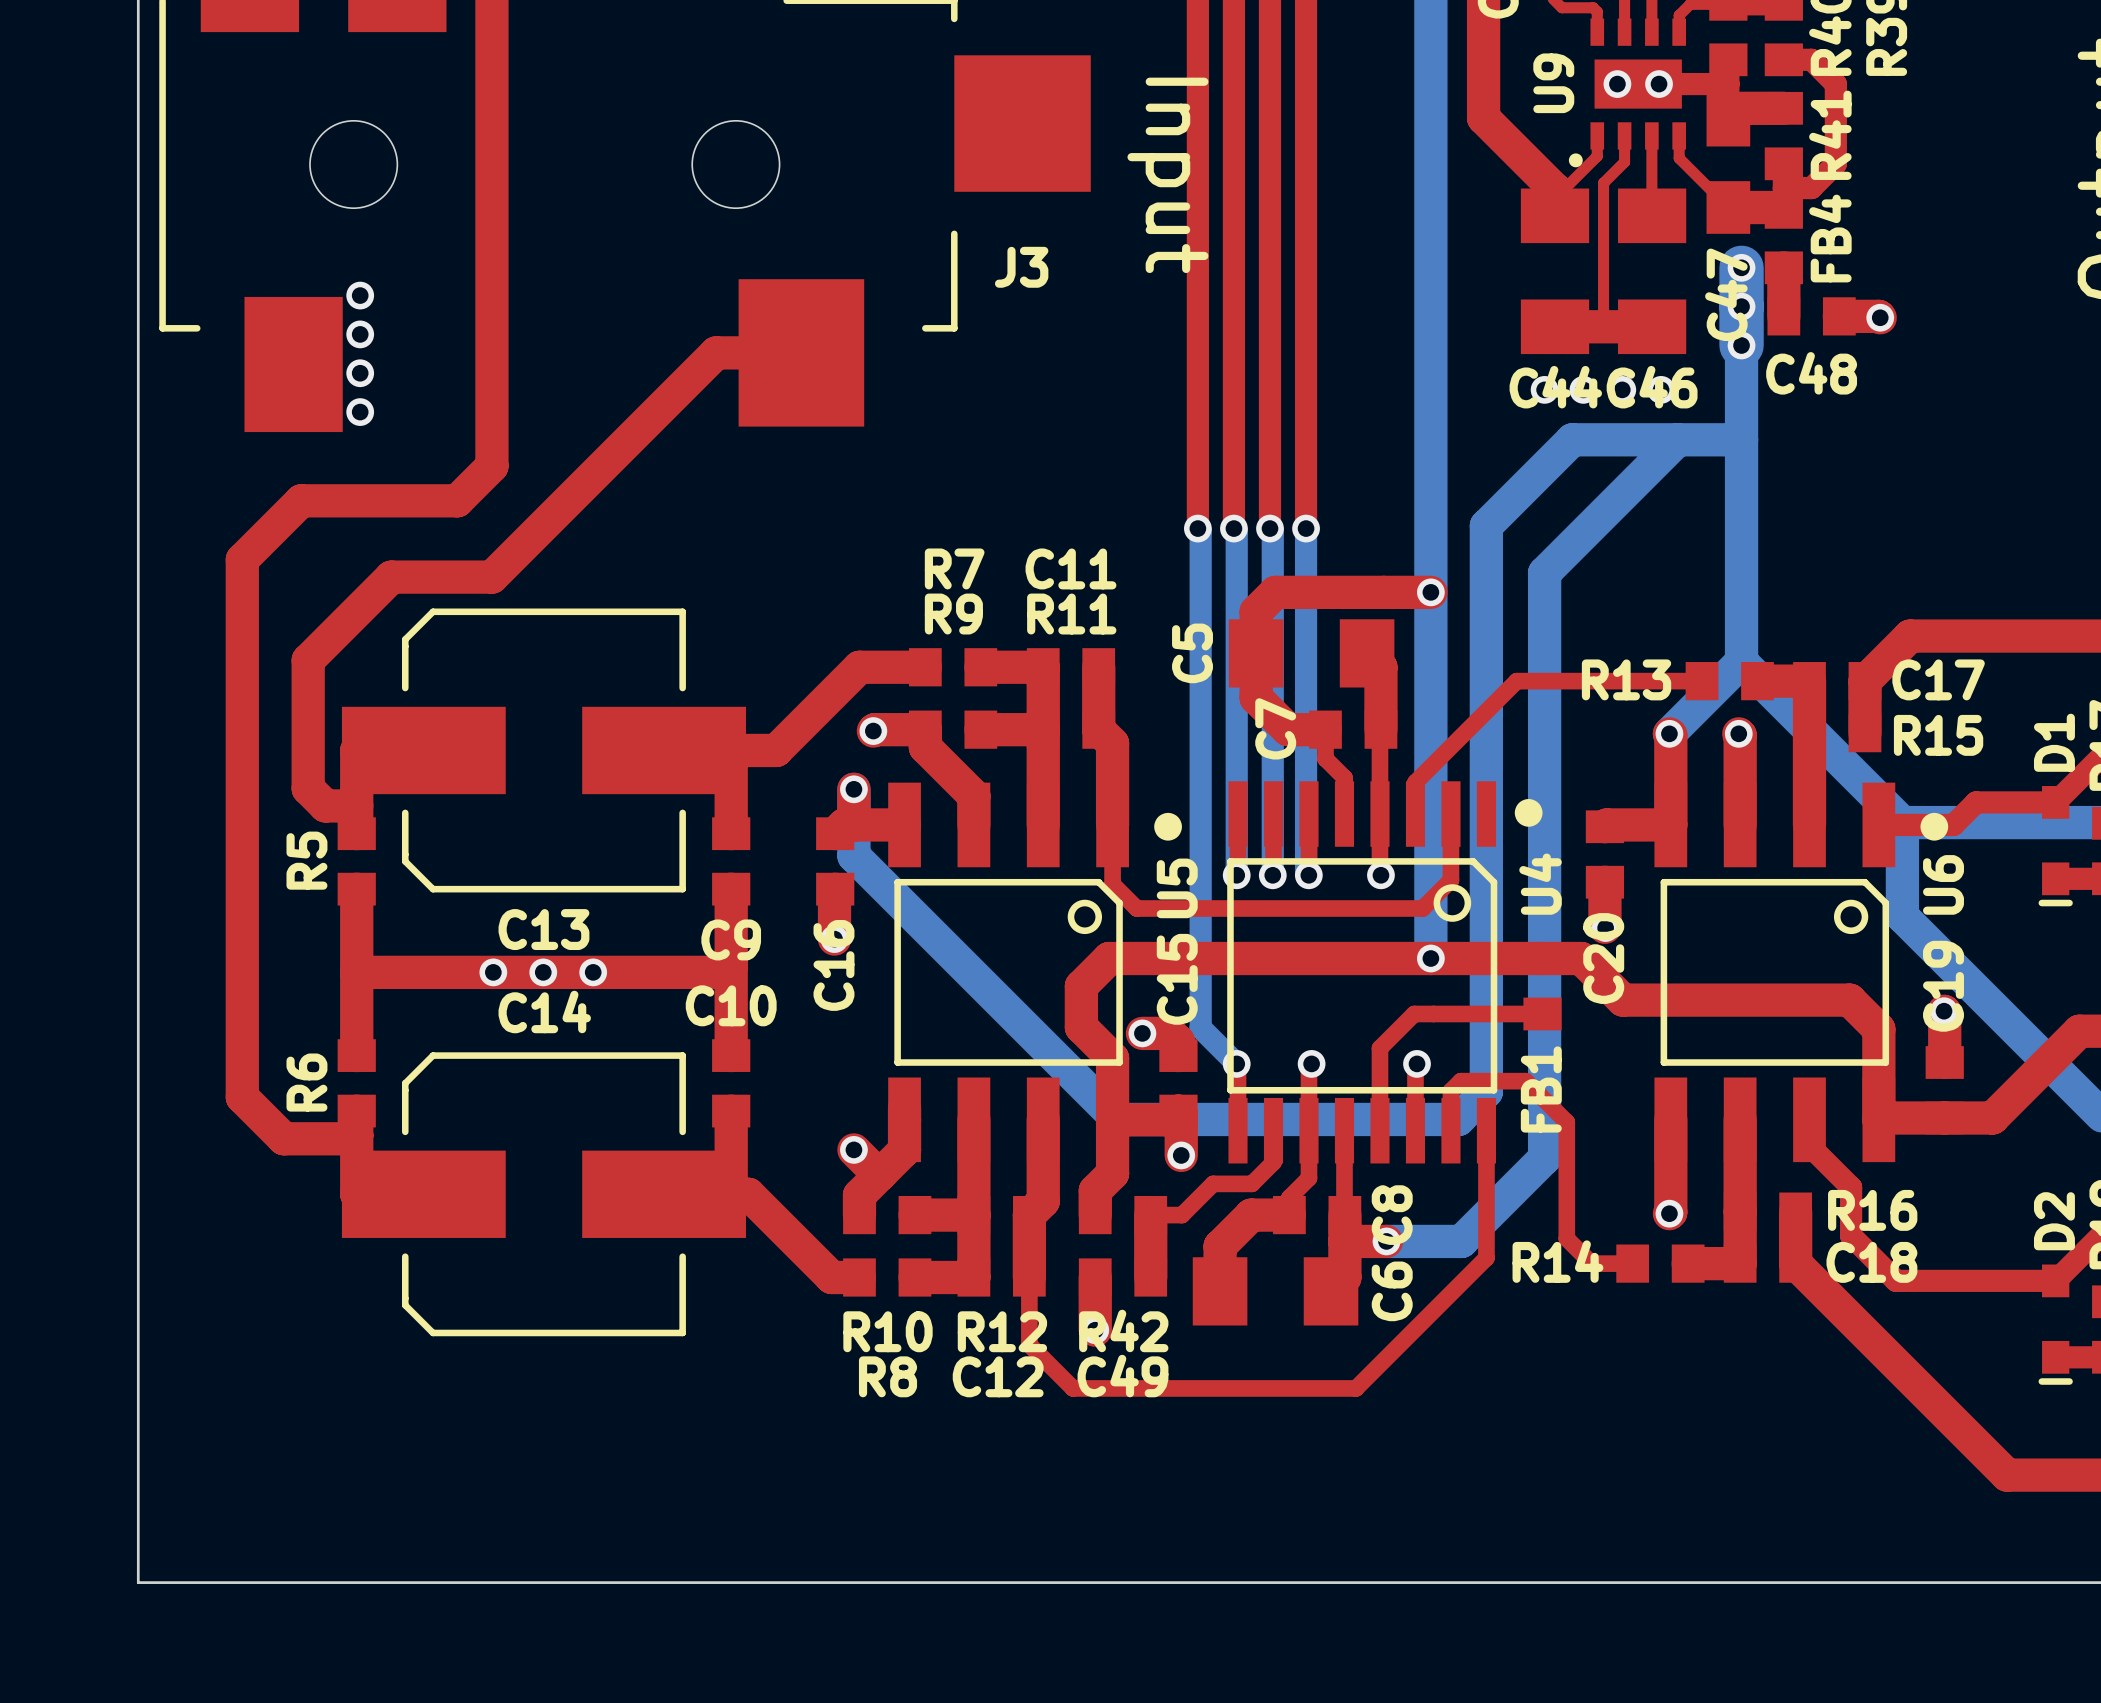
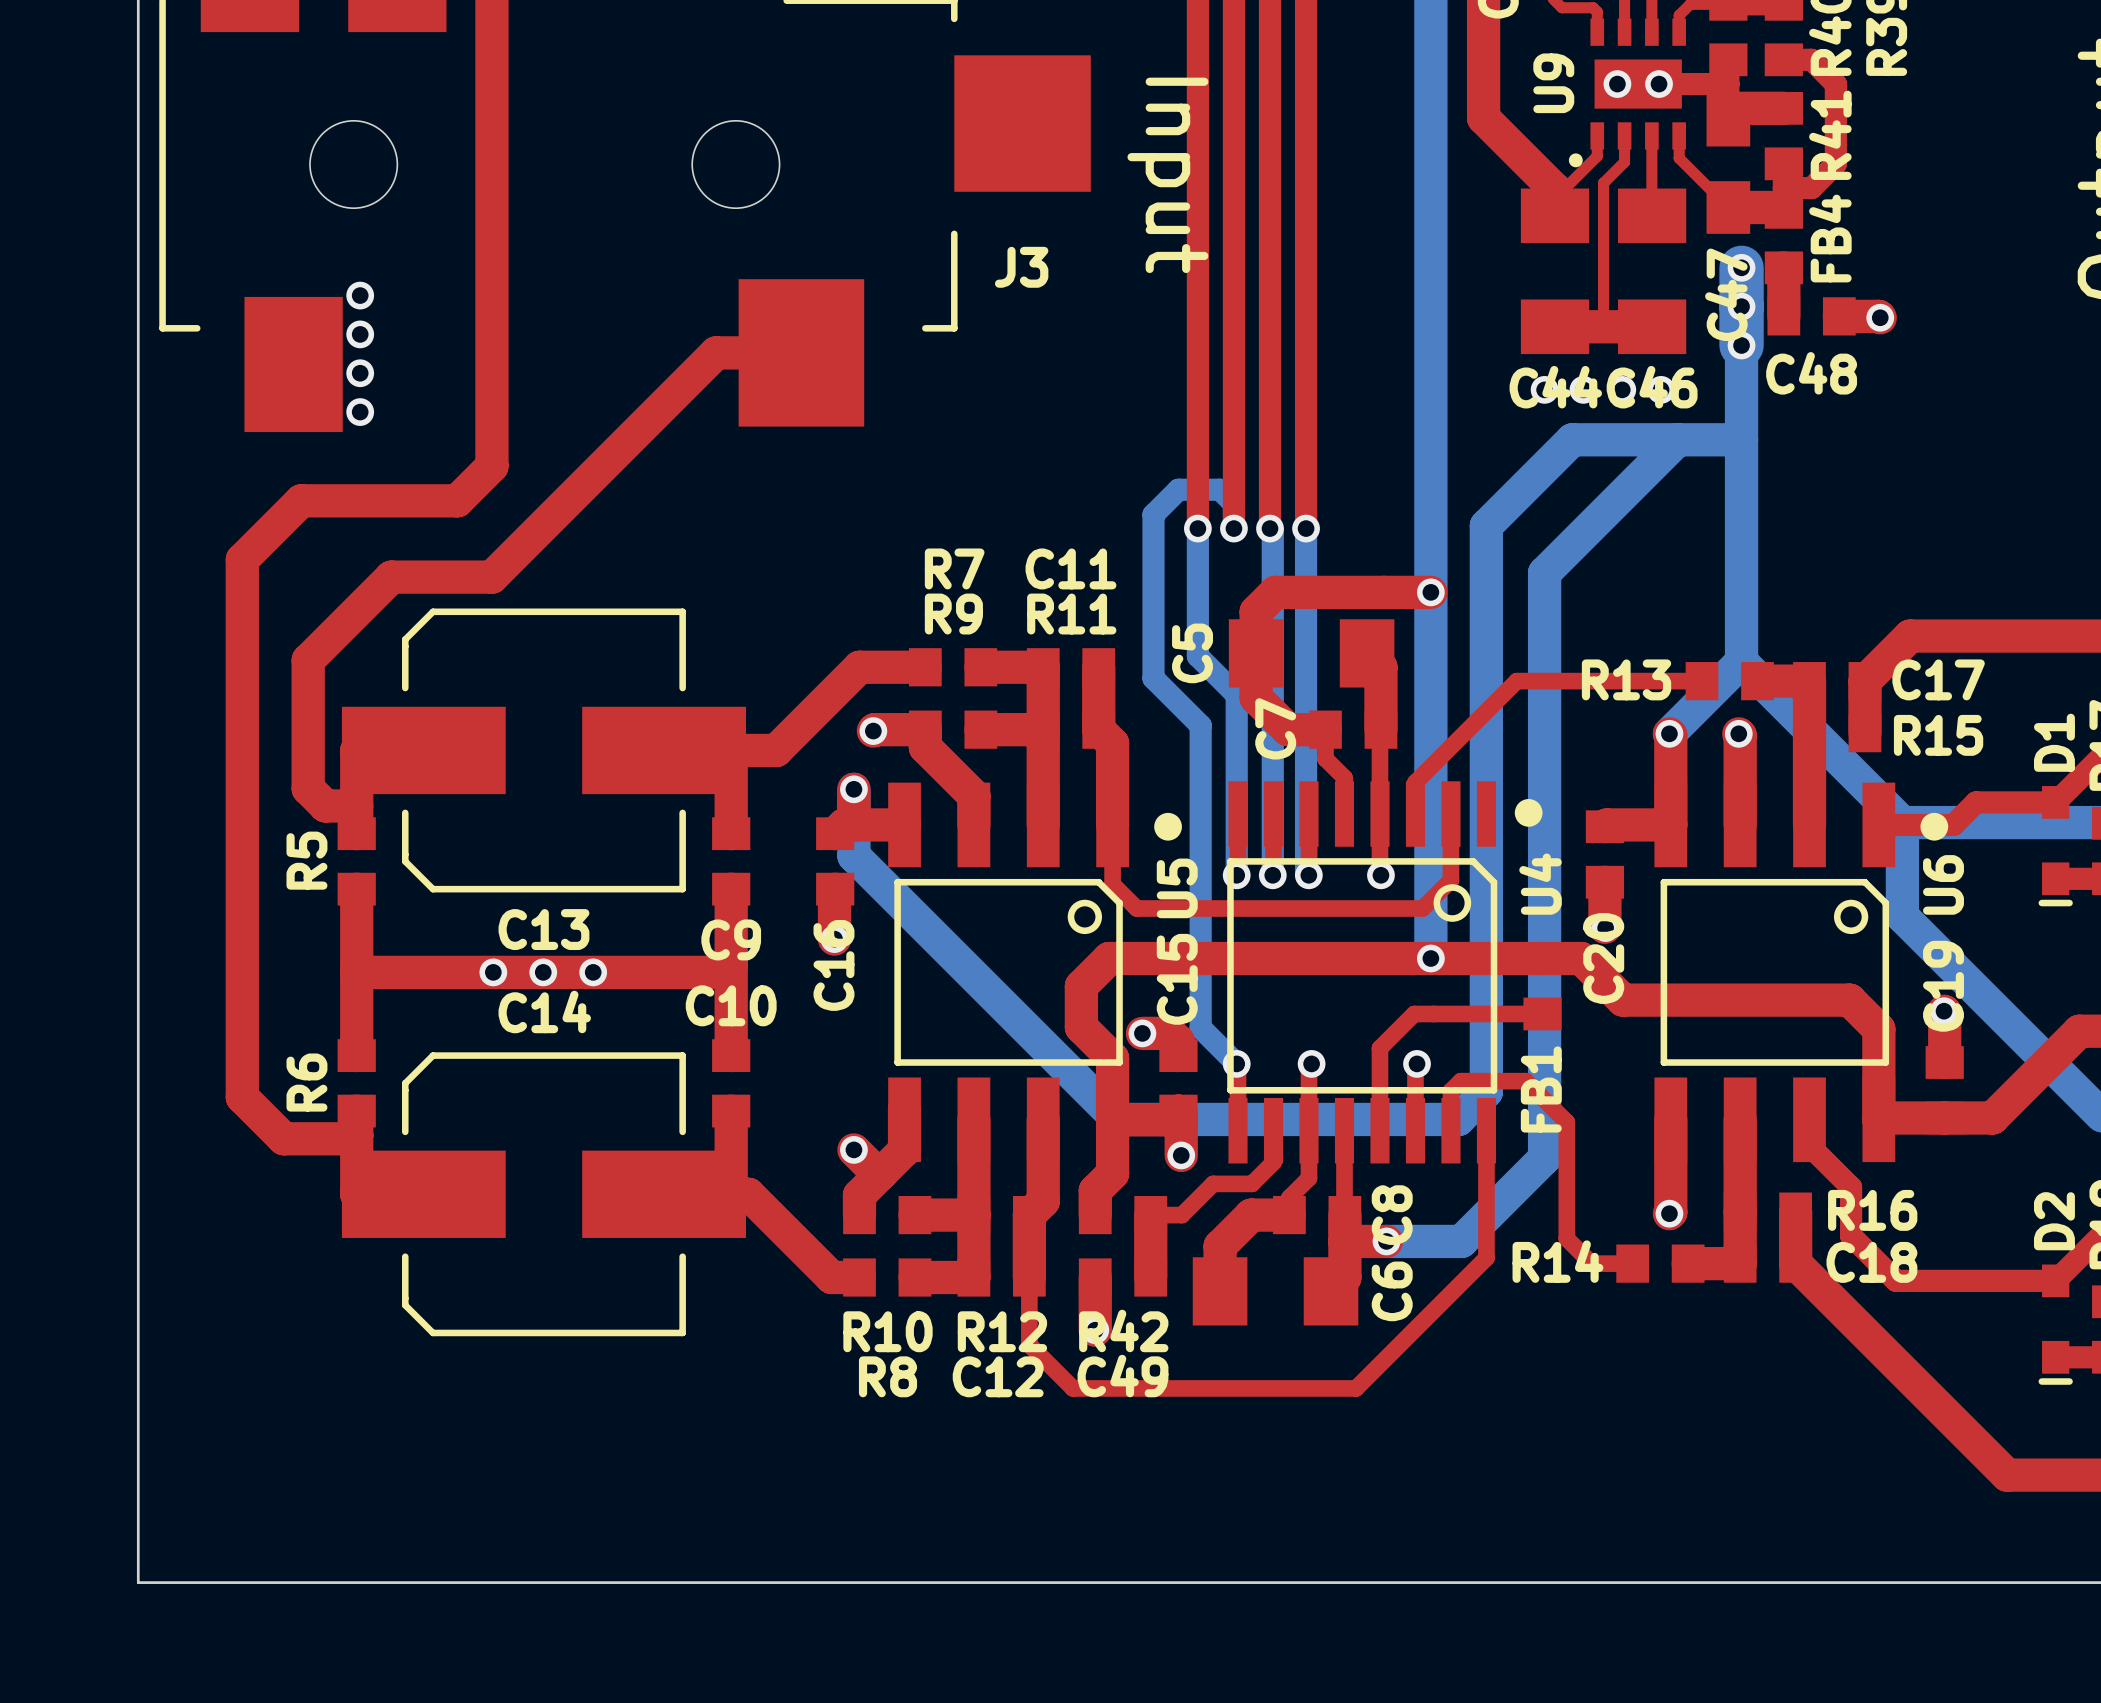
bottom track: (1197, 528) (1200, 531) (1200, 725) -> (1233, 528) (1233, 503) (1220, 489) (1178, 489) (1153, 514) (1153, 678) (1200, 725)
bottom track: (1233, 528) (1236, 531) (1236, 694) -> (1197, 528) (1197, 656) (1236, 694)

